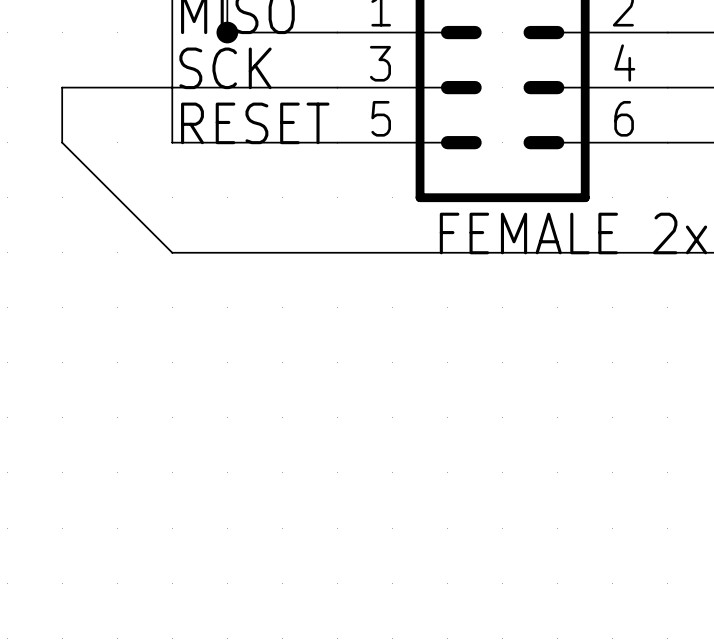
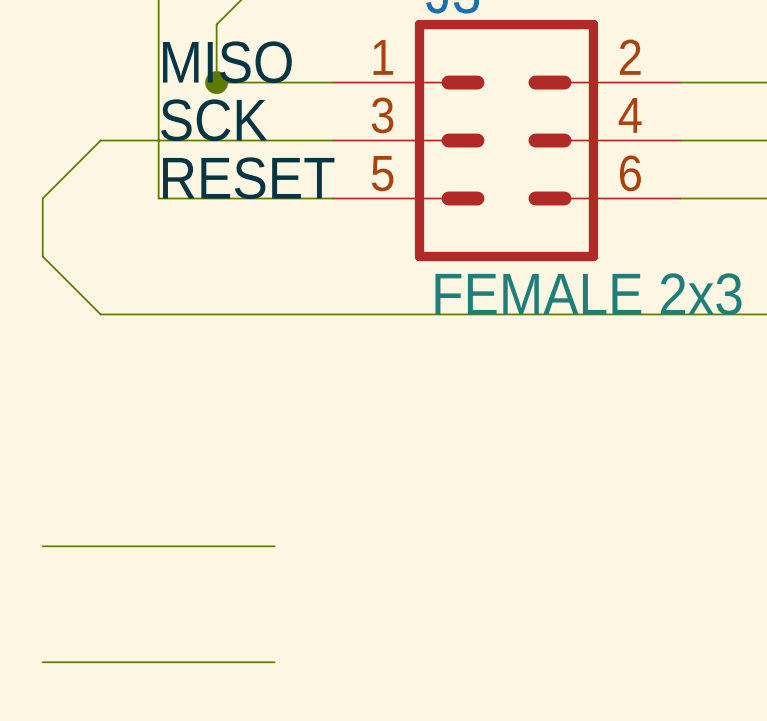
wire: (117, 87) (62, 87) (62, 142) (172, 252) -> (100, 140) (42, 198) (42, 256) (100, 314) (158, 314)
wire: none -> (42, 546) (274, 546)
wire: none -> (42, 662) (274, 662)

